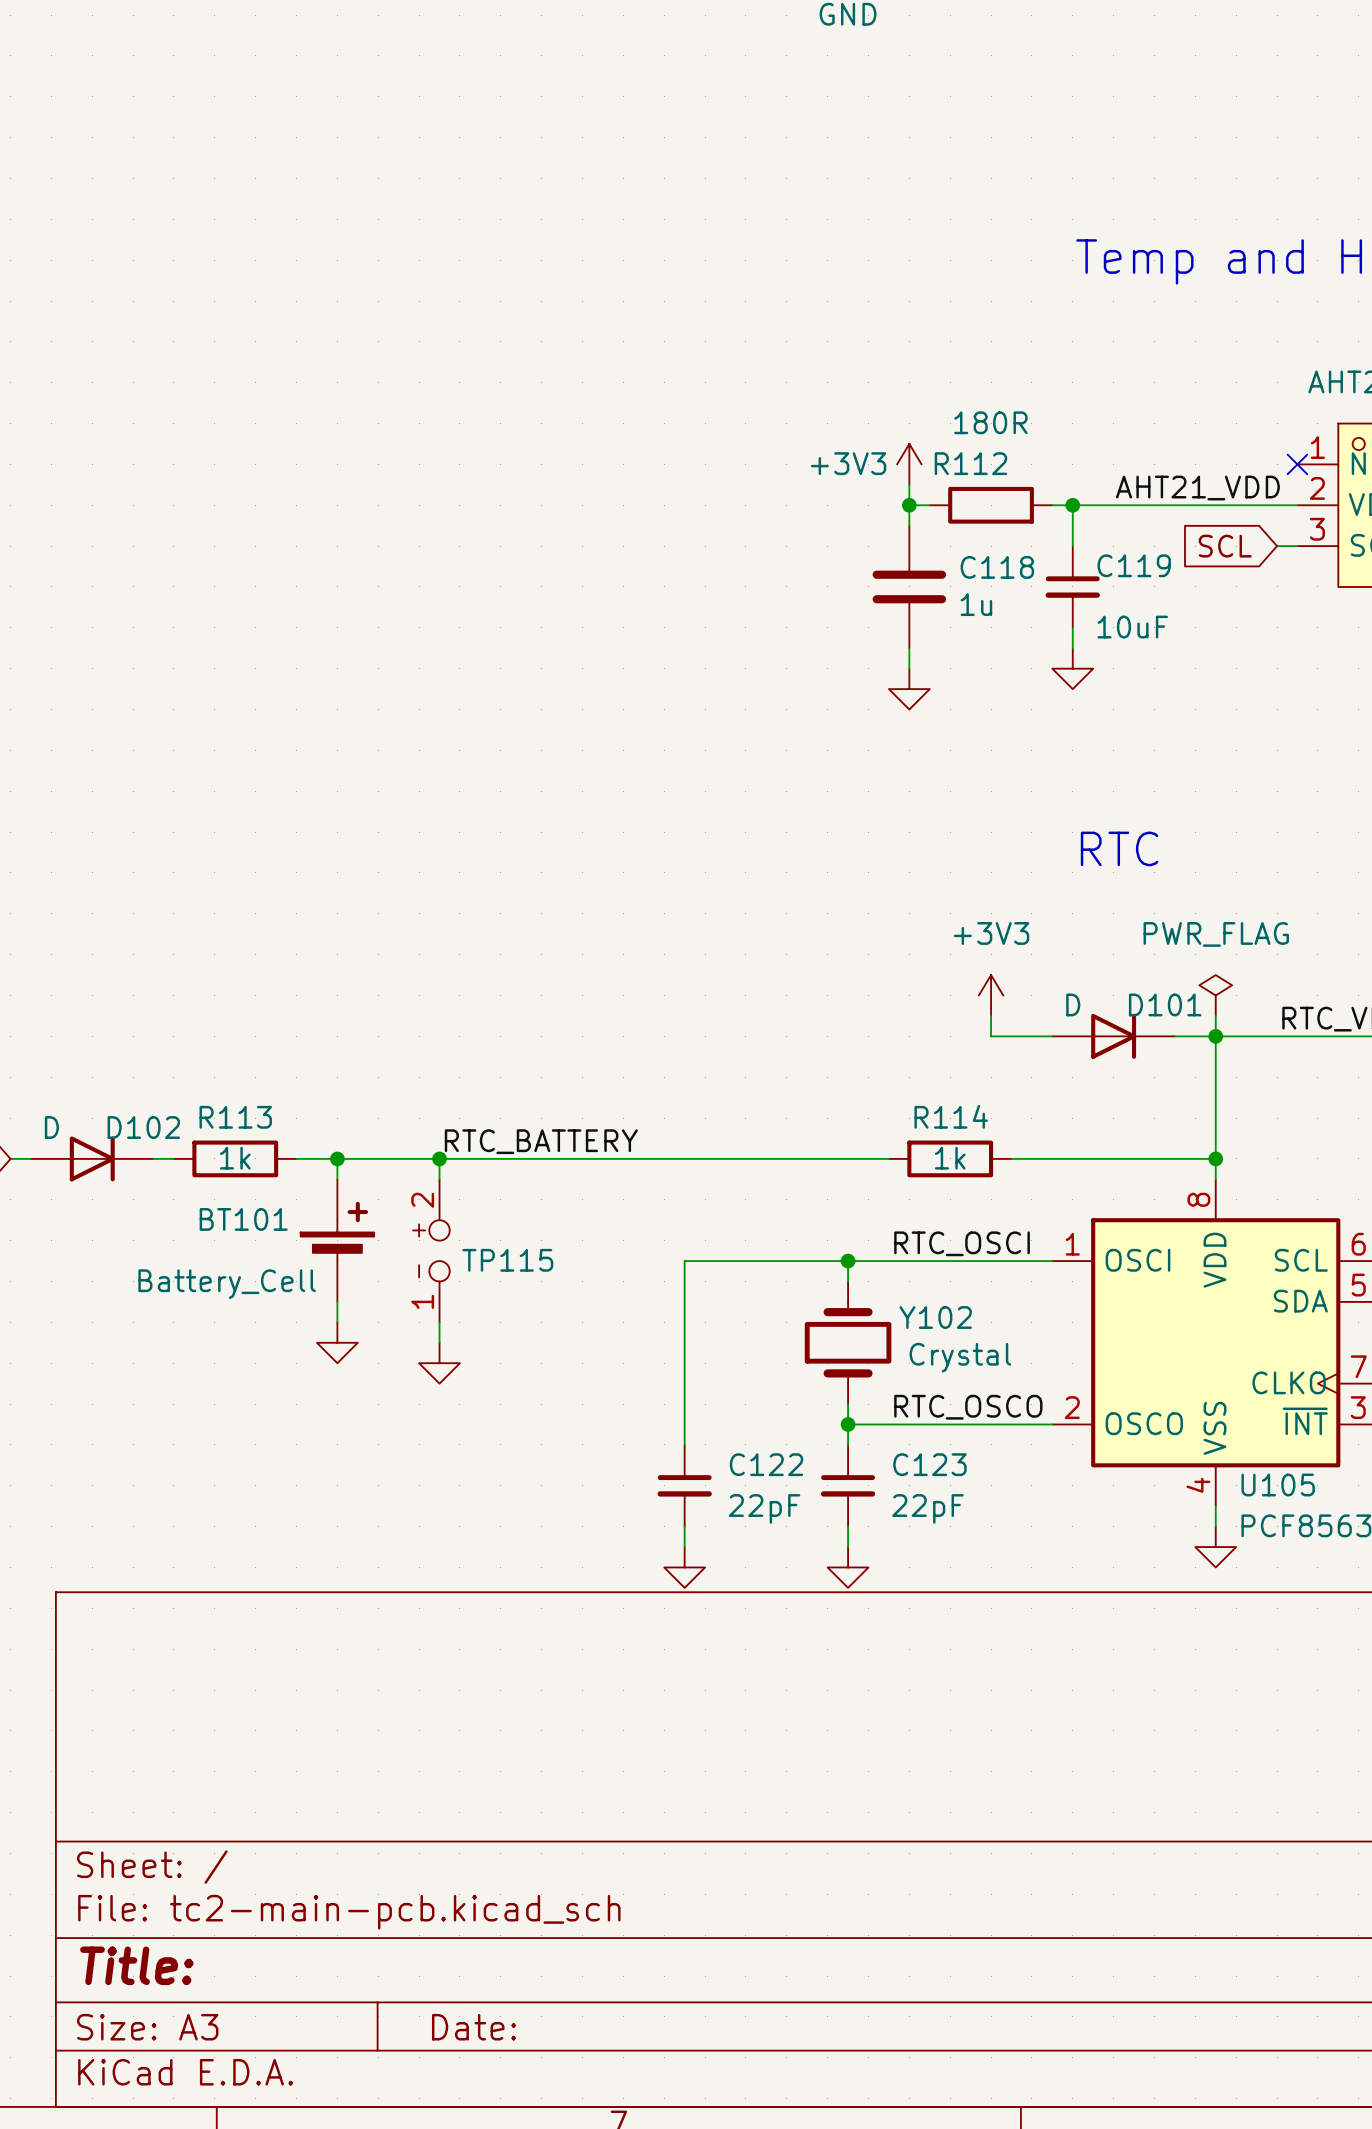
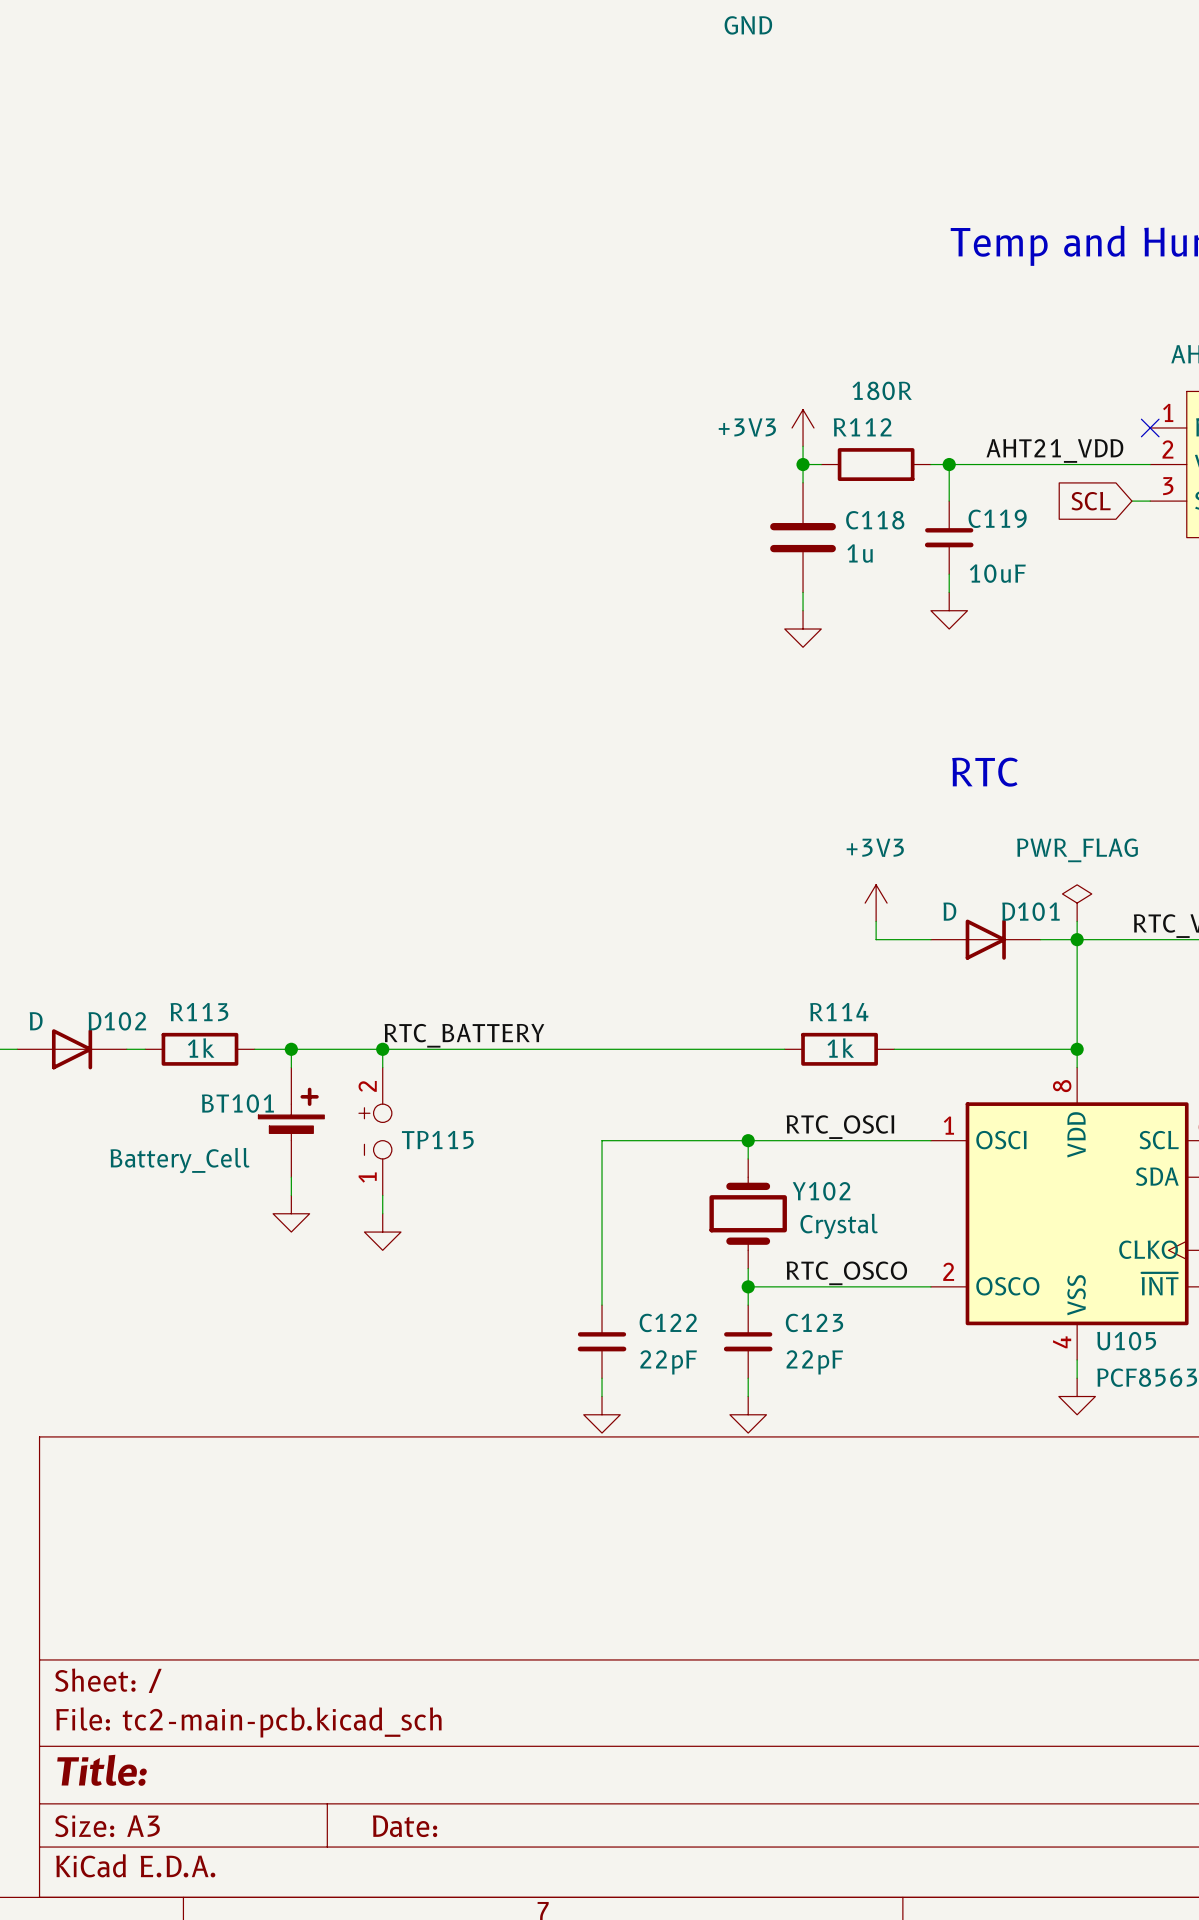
BT101 name position: BT101 (243, 1219) -> BT101 (237, 1103)

